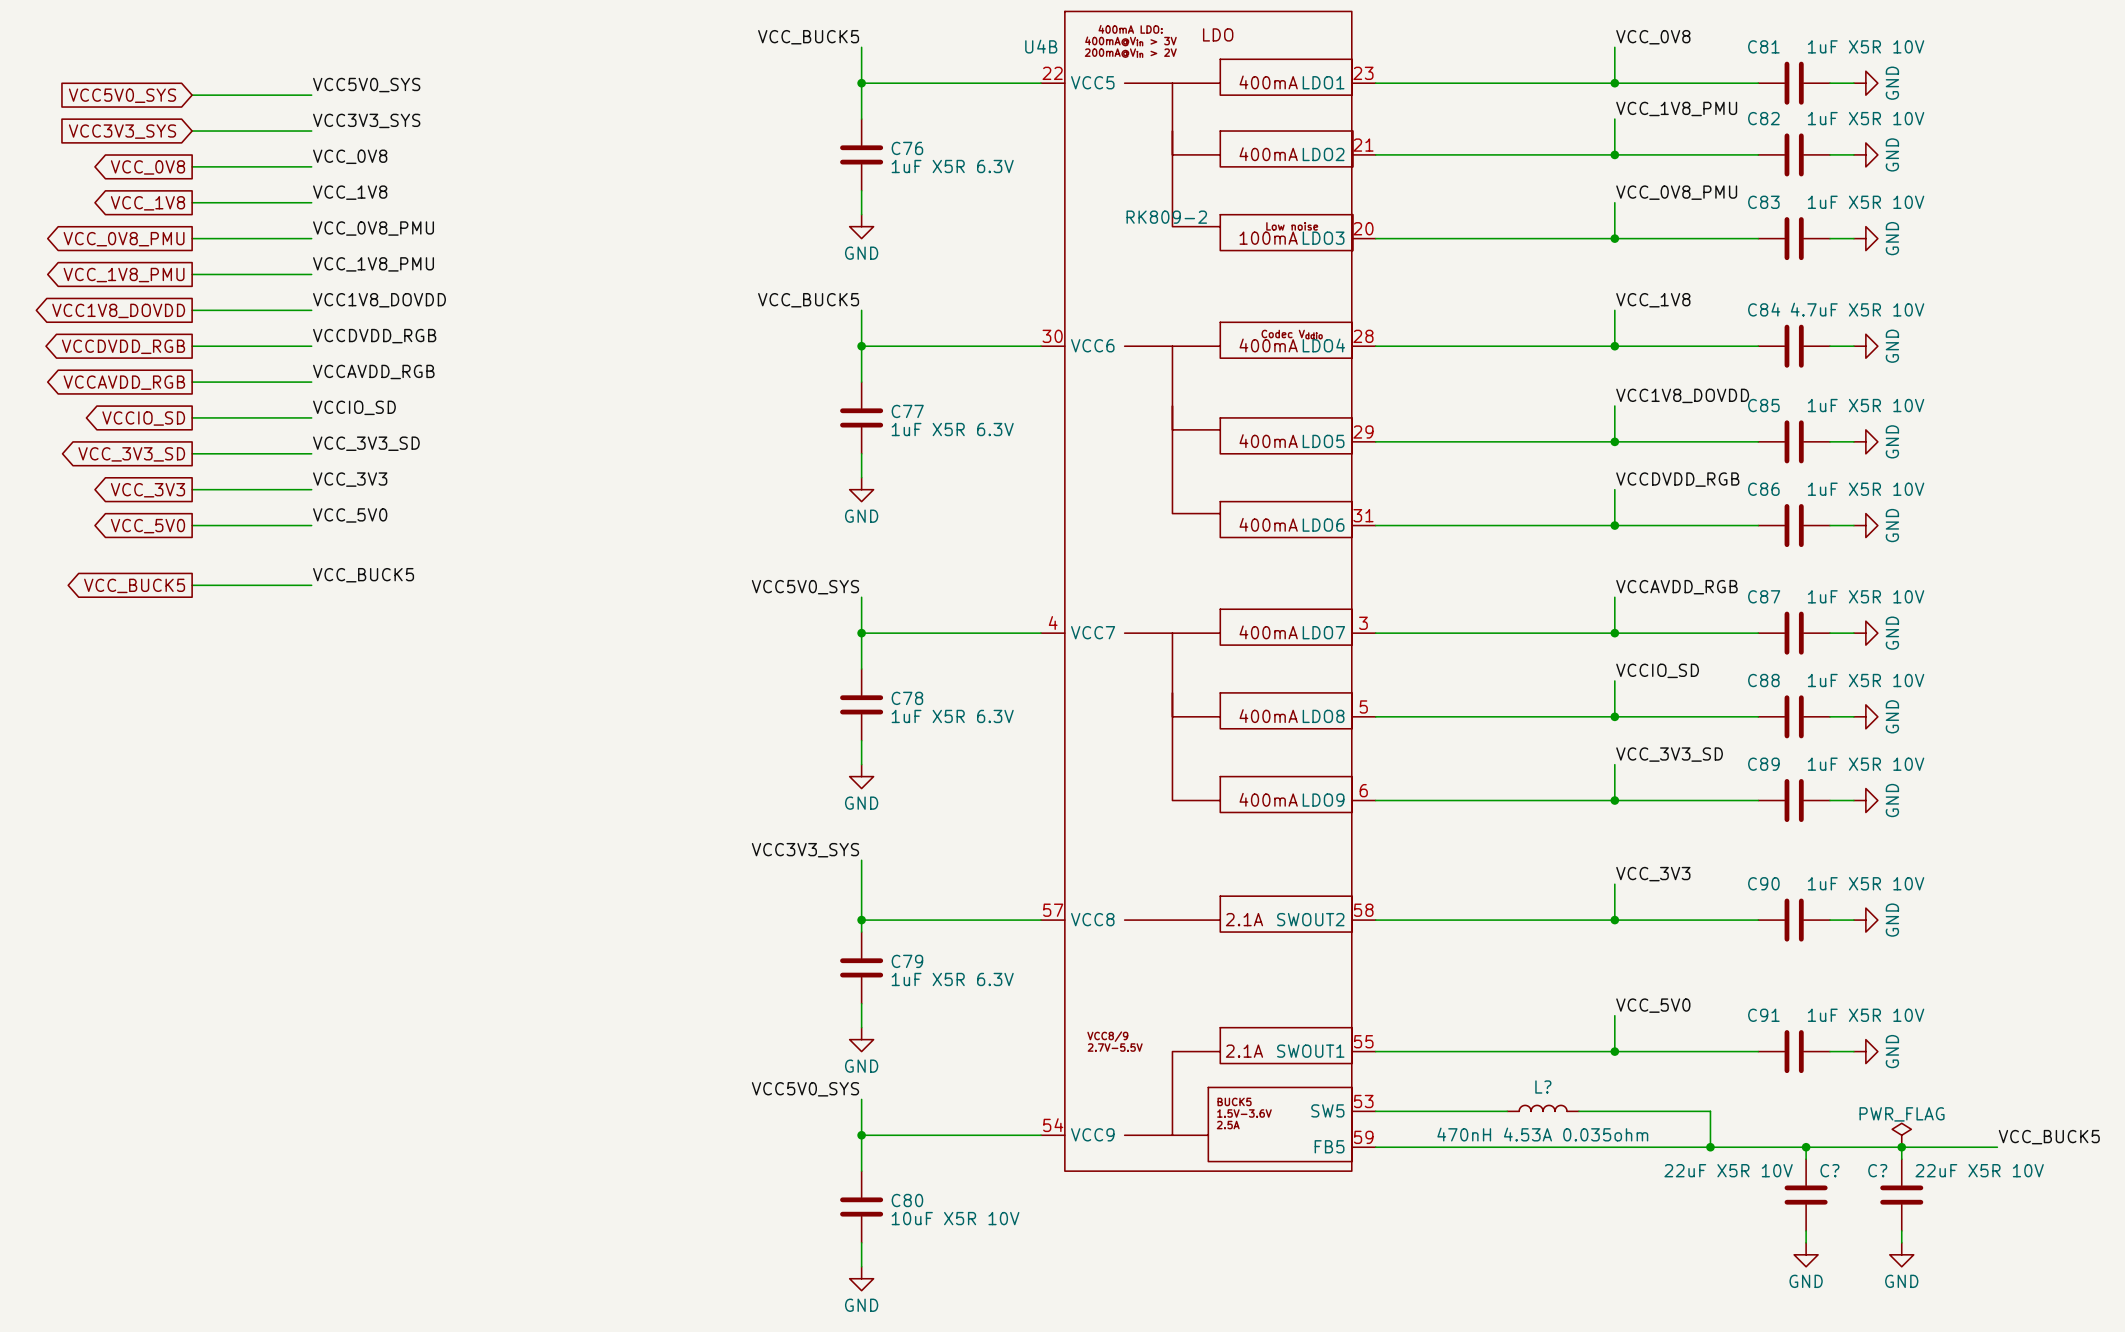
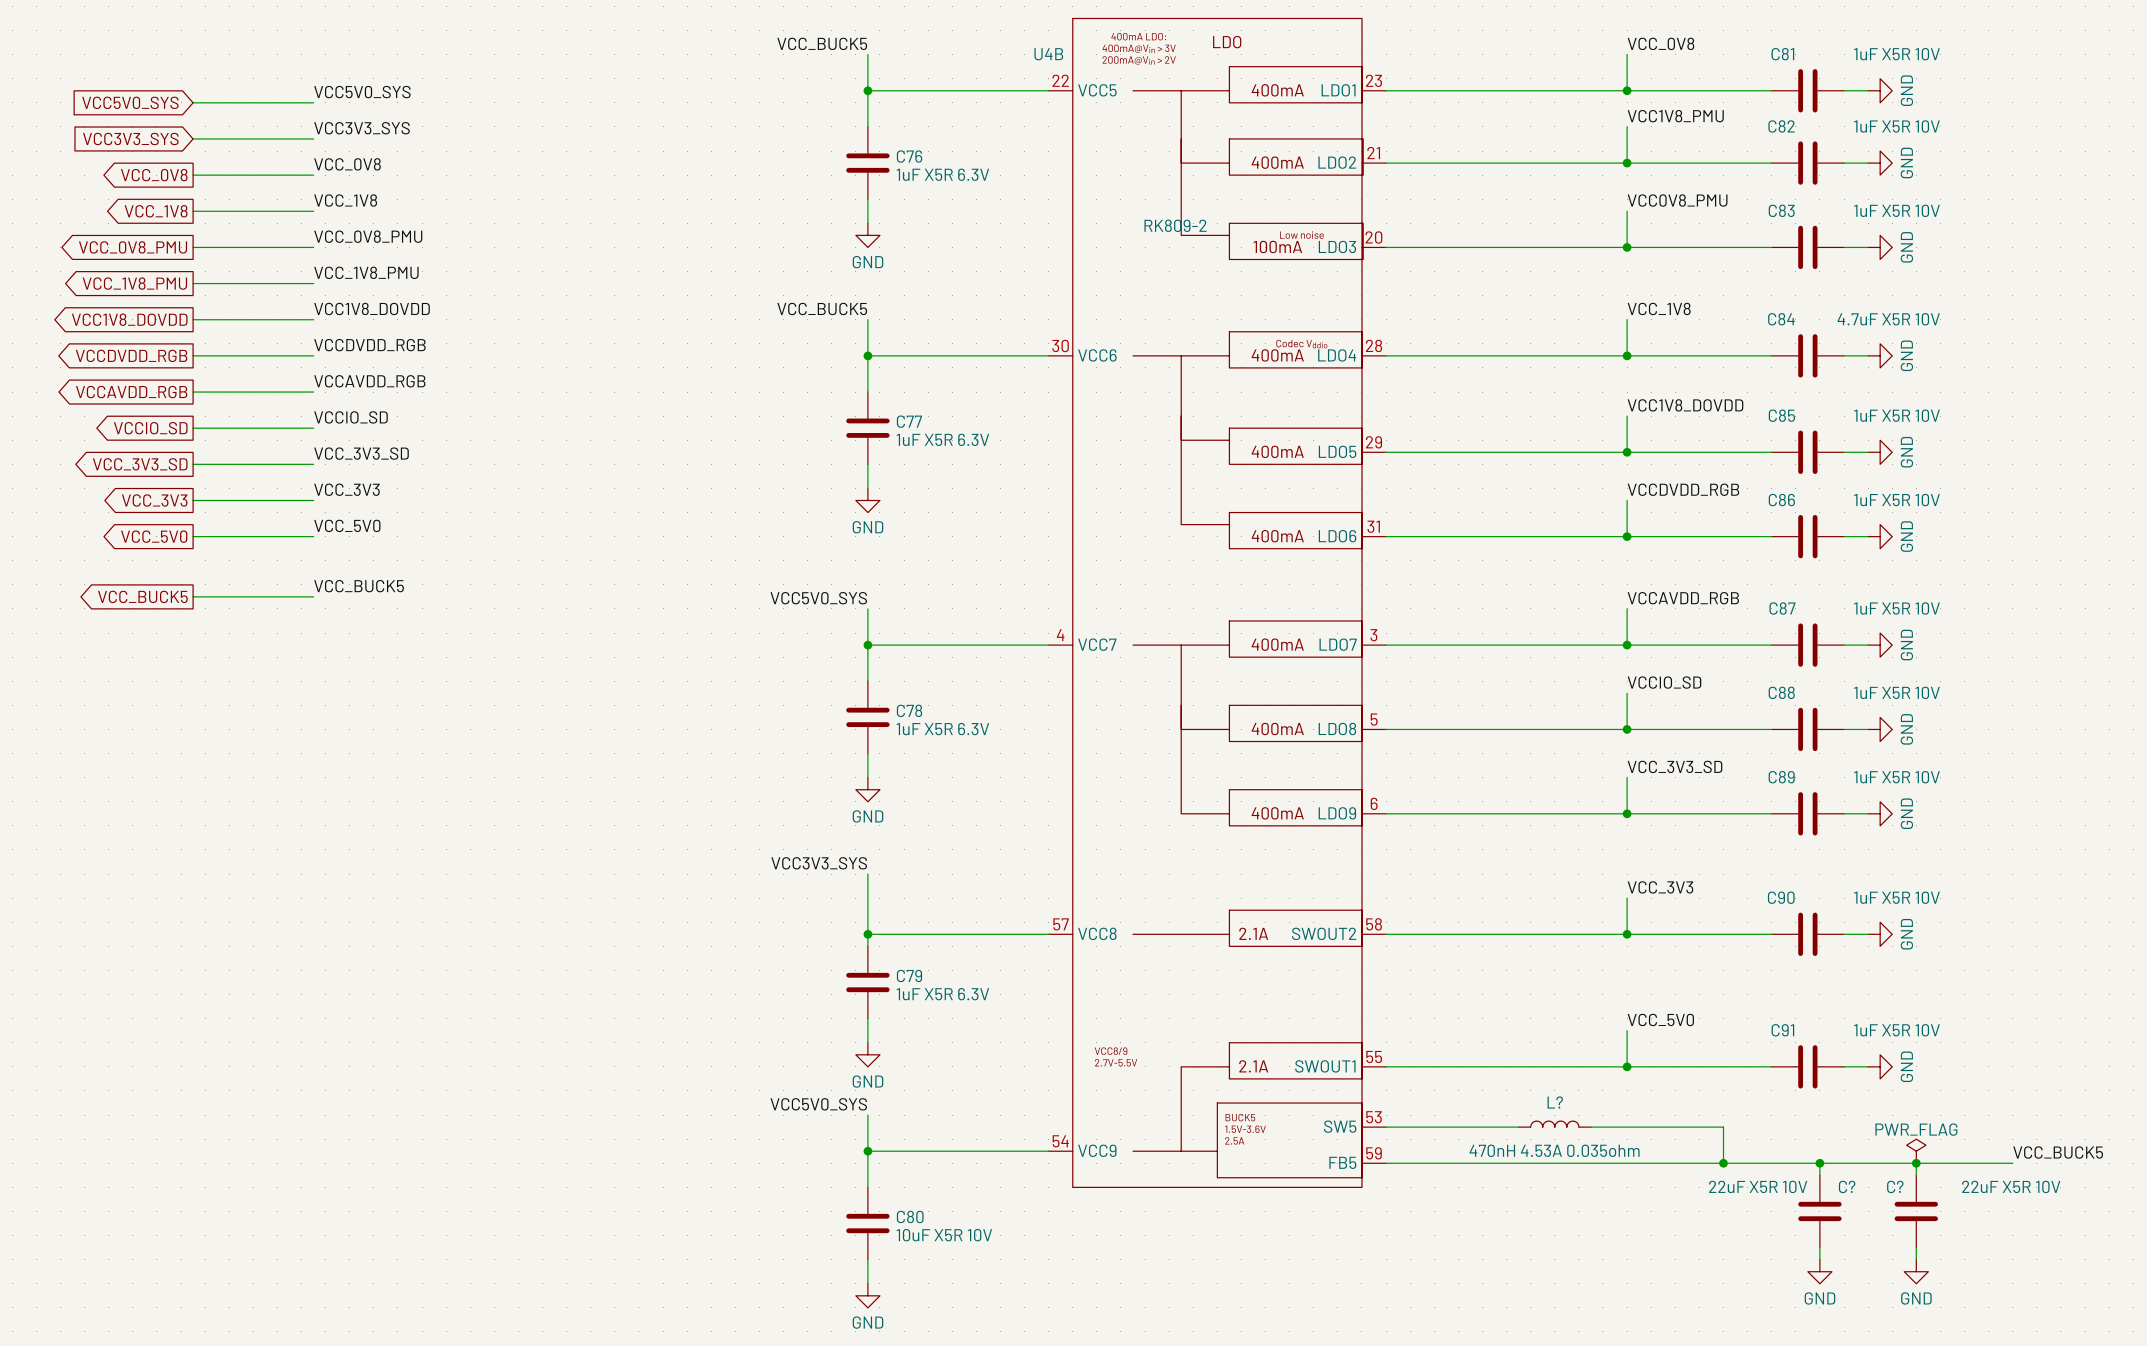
label: VCC_1V8_PMU (1676, 108) -> VCC1V8_PMU (1675, 116)
label: VCC_0V8_PMU (1676, 192) -> VCC0V8_PMU (1677, 200)

